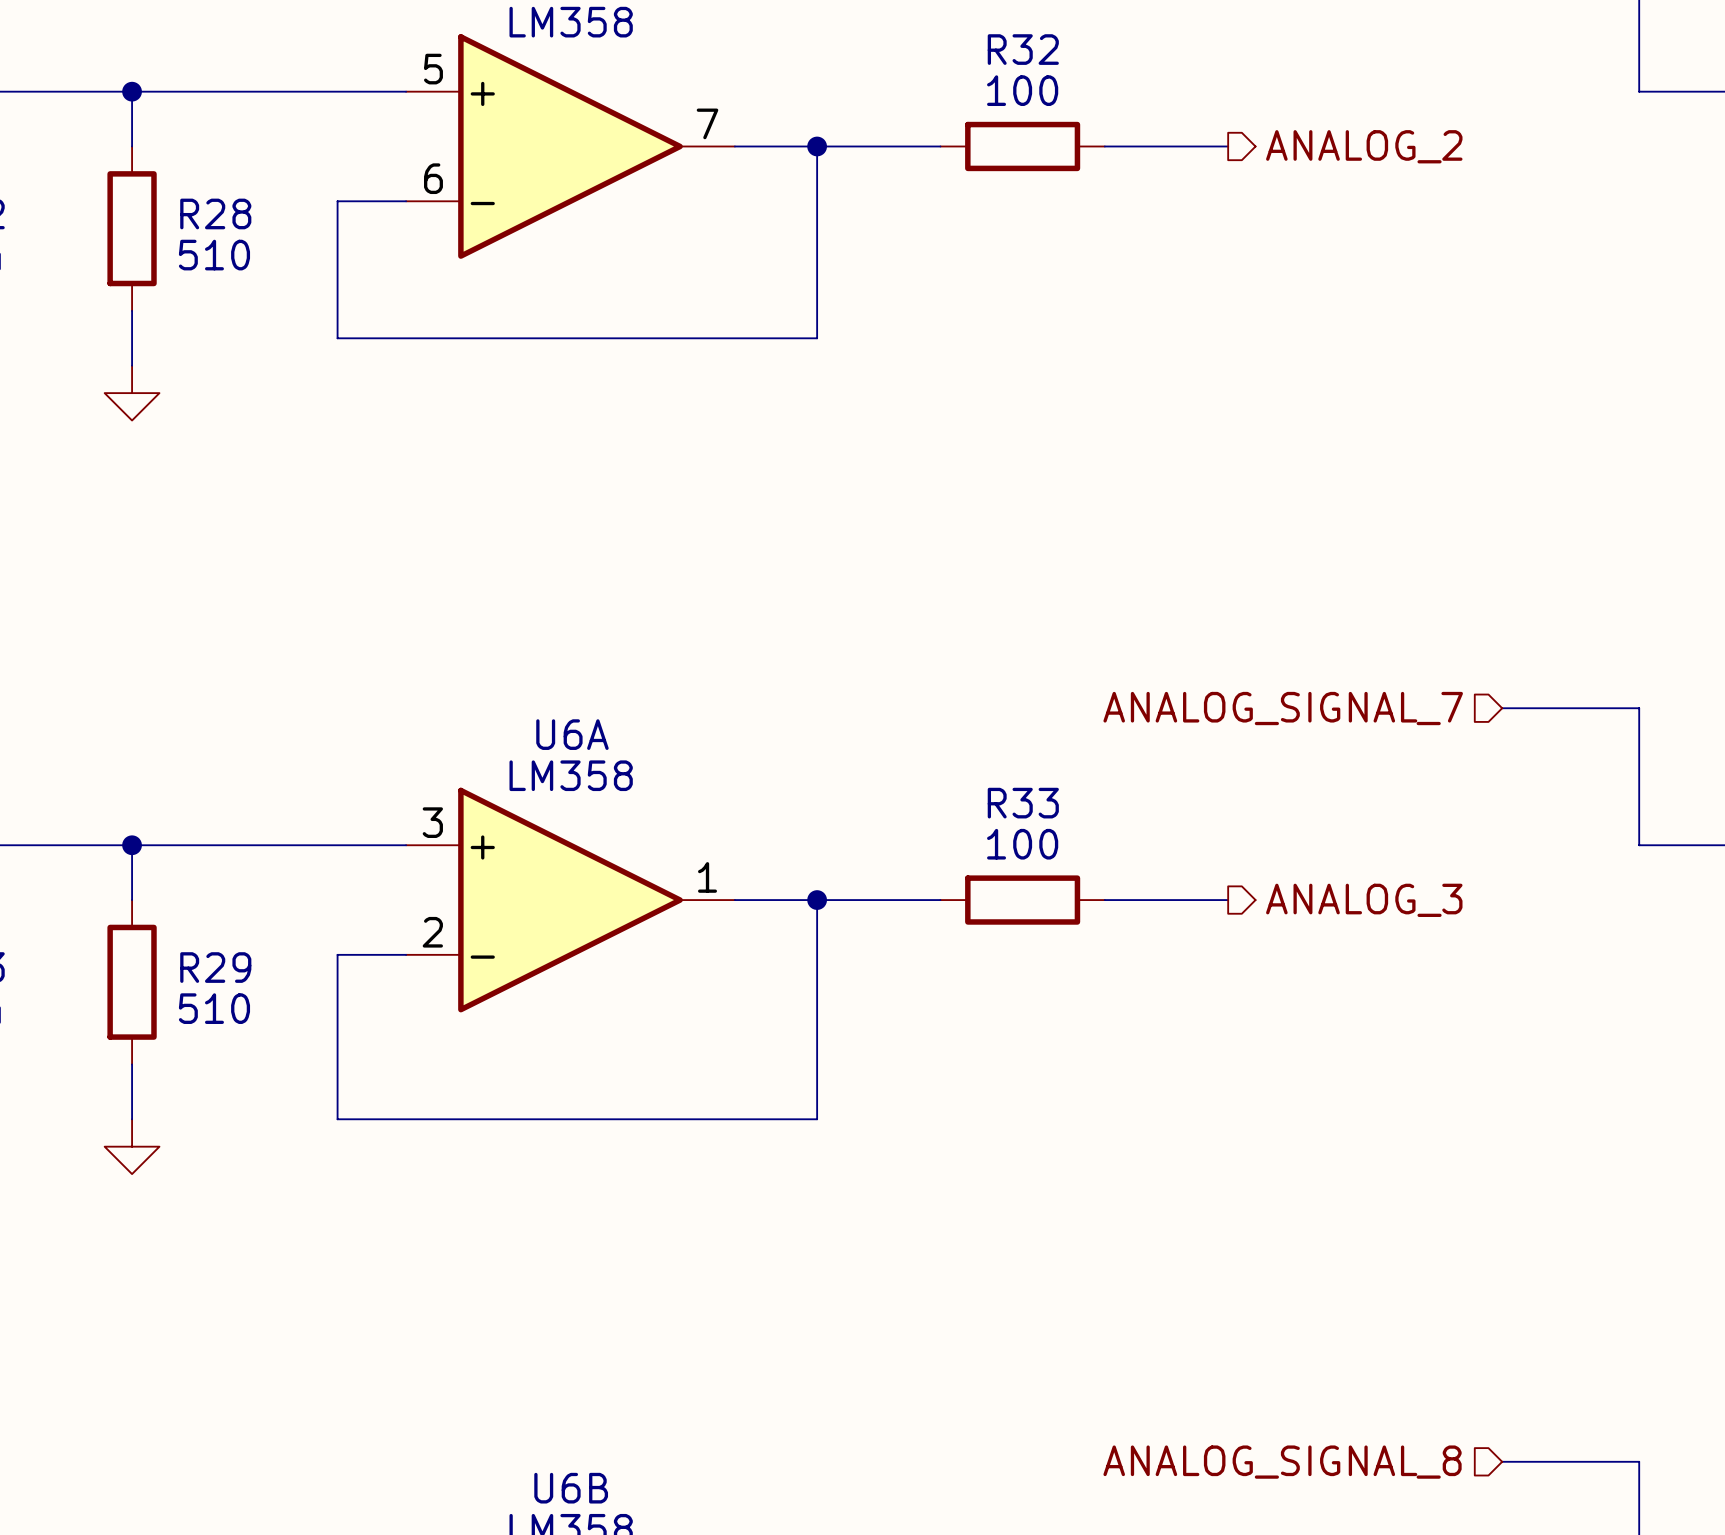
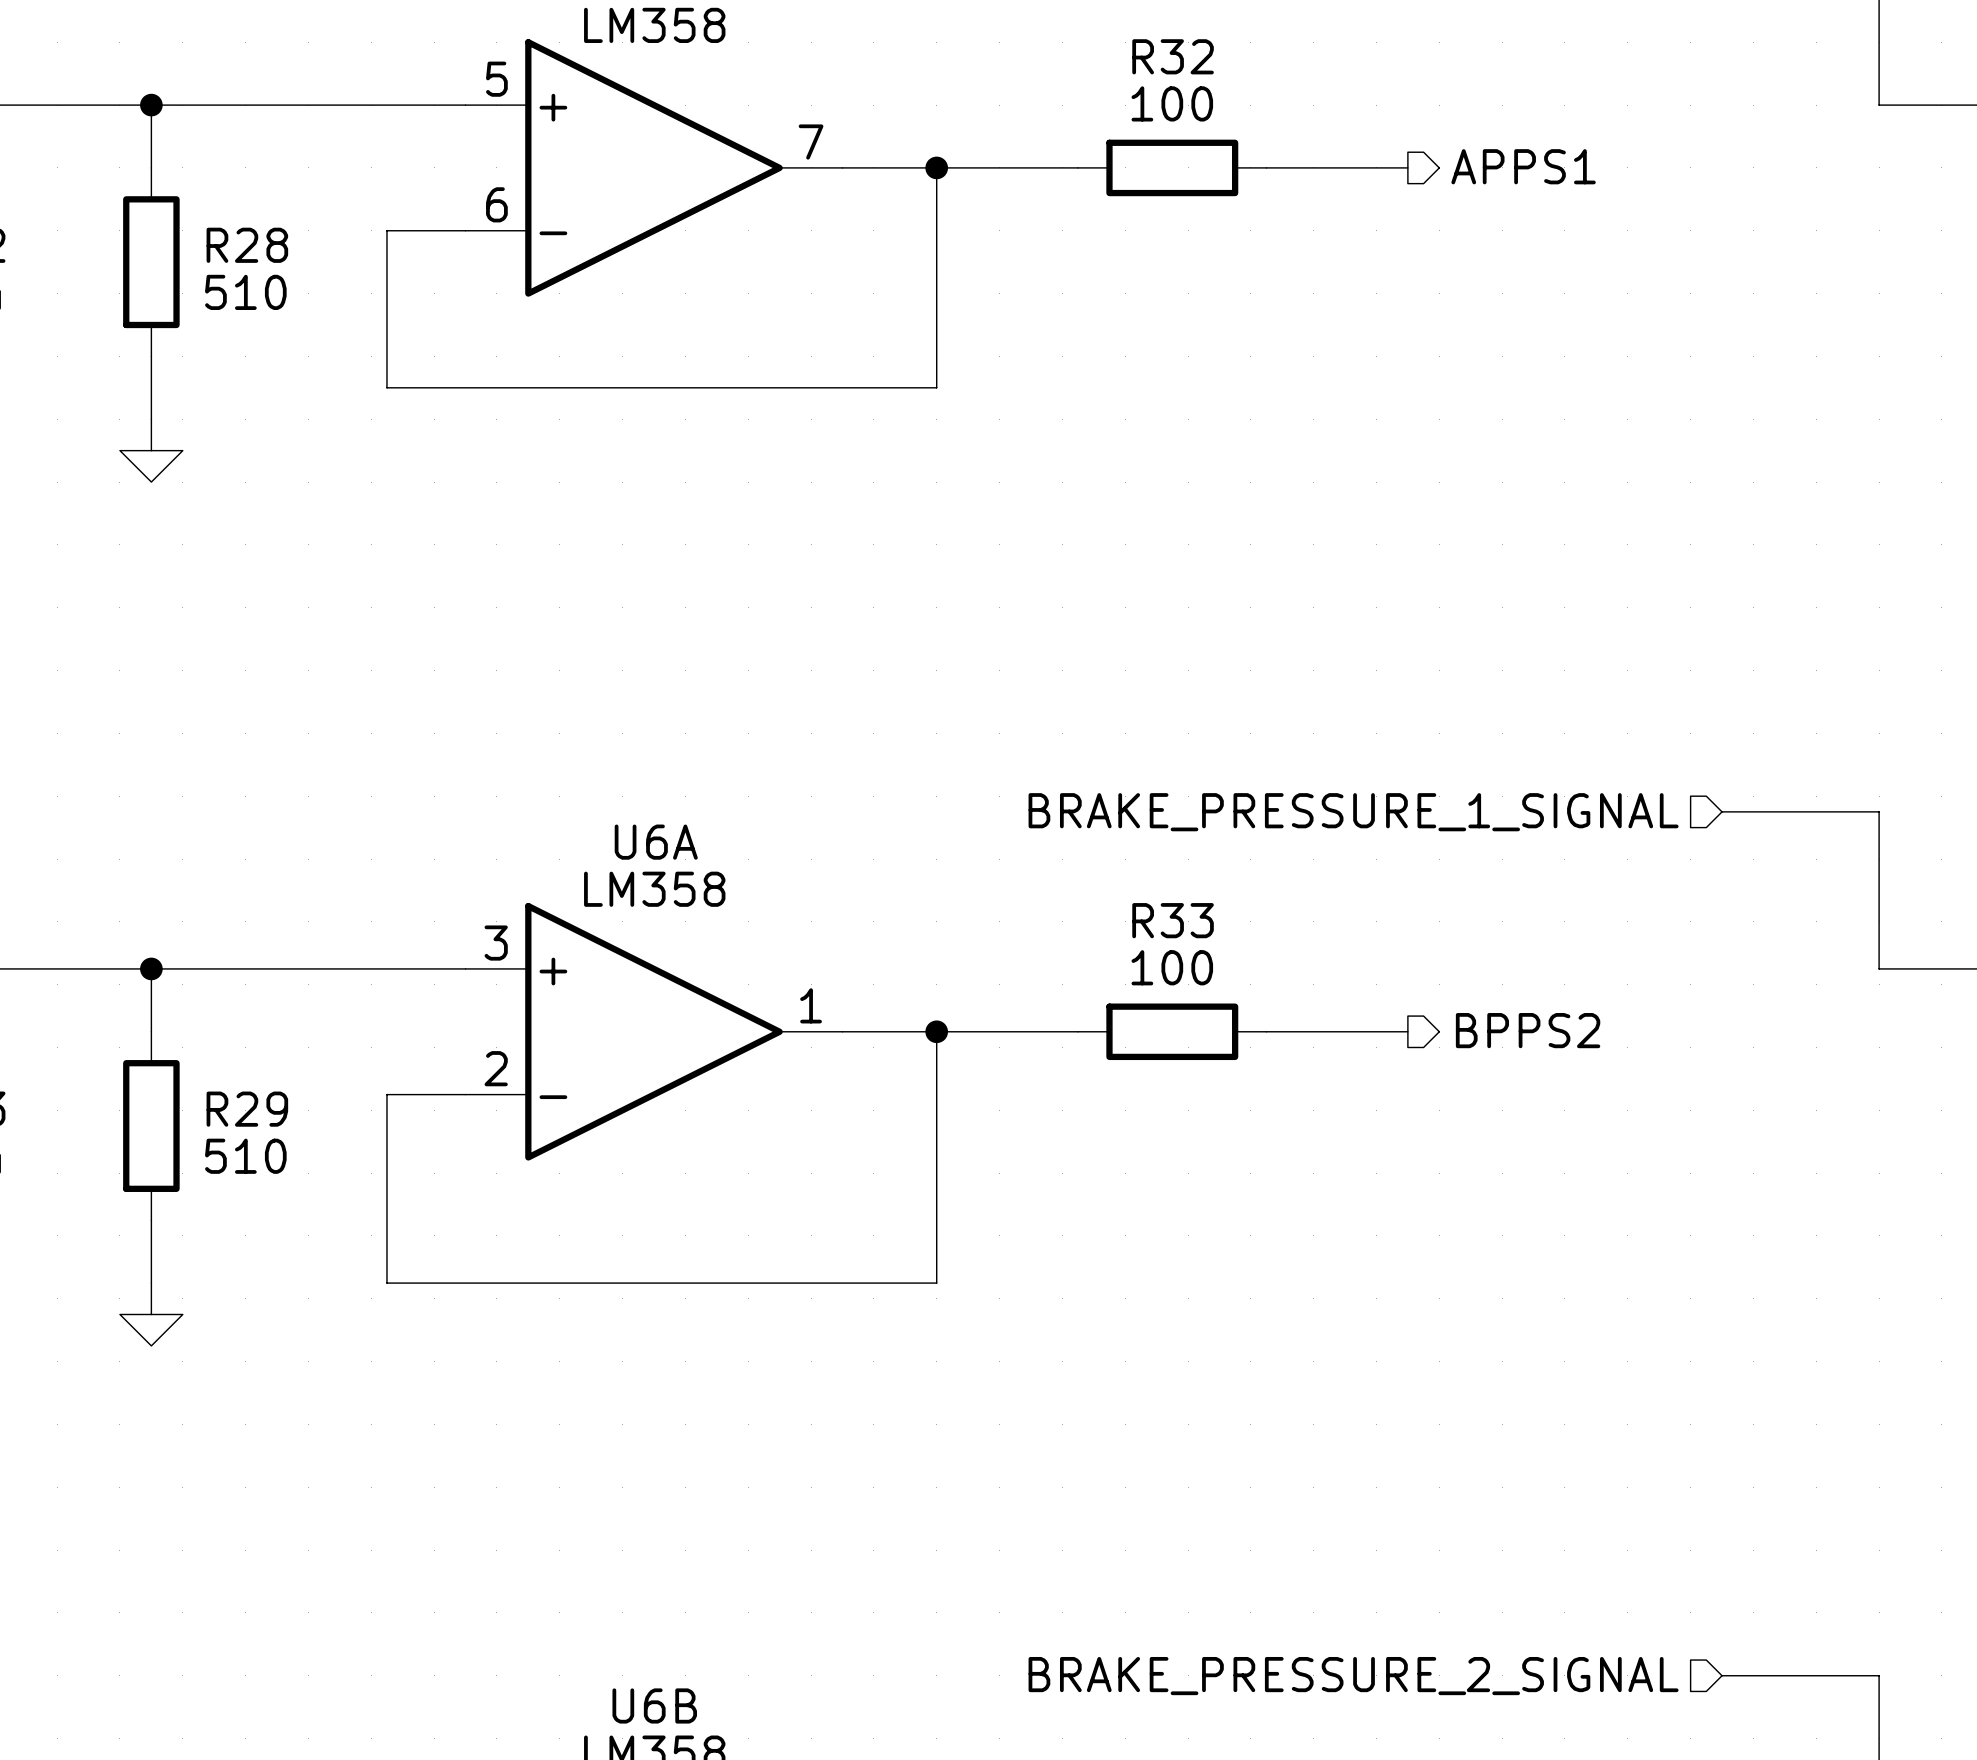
hierarchical label: ANALOG_2 (1364, 146) -> APPS1 (1523, 166)
hierarchical label: ANALOG_SIGNAL_7 (1283, 708) -> BRAKE_PRESSURE_1_SIGNAL (1353, 812)
hierarchical label: ANALOG_3 (1364, 900) -> BPPS2 (1528, 1030)
hierarchical label: ANALOG_SIGNAL_8 (1282, 1462) -> BRAKE_PRESSURE_2_SIGNAL (1353, 1676)

